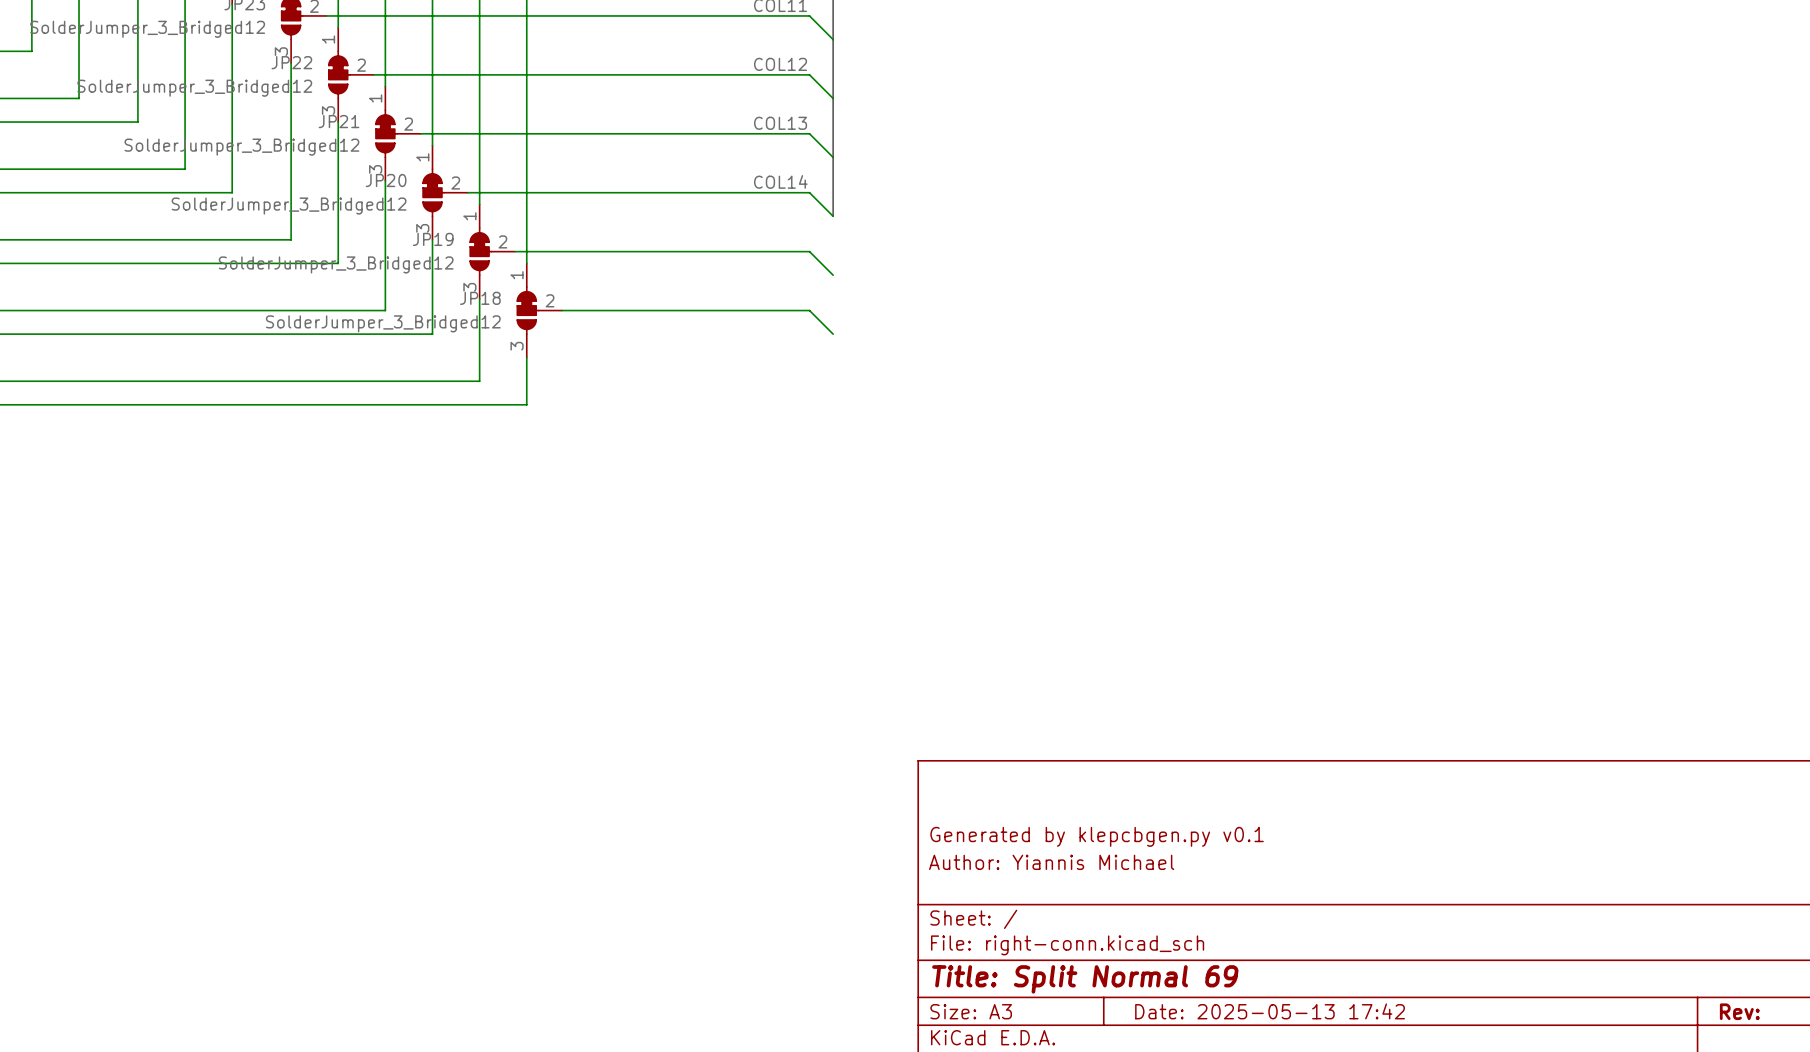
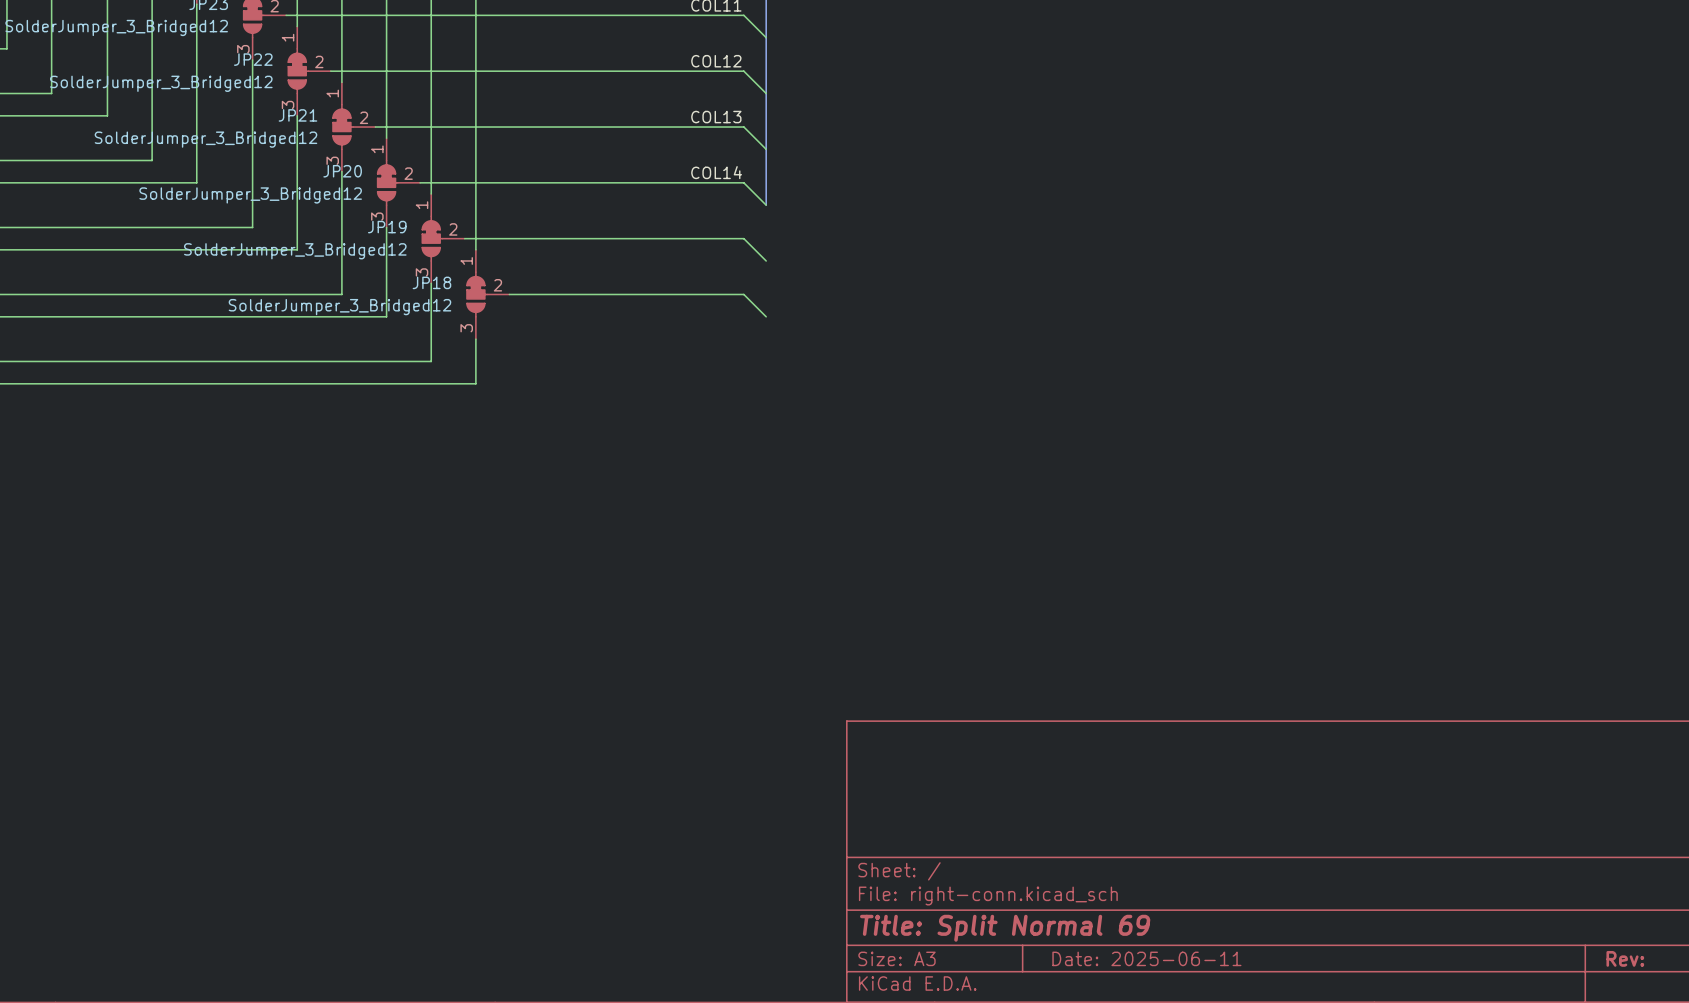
title block: Generated by klepcbgen.py v0.1 (1097, 836) -> none
title block: Author: Yiannis Michael (1051, 862) -> none
title block: Date: 2025-05-13 17:42 (1270, 1011) -> Date: 2025-06-11 (1146, 958)

